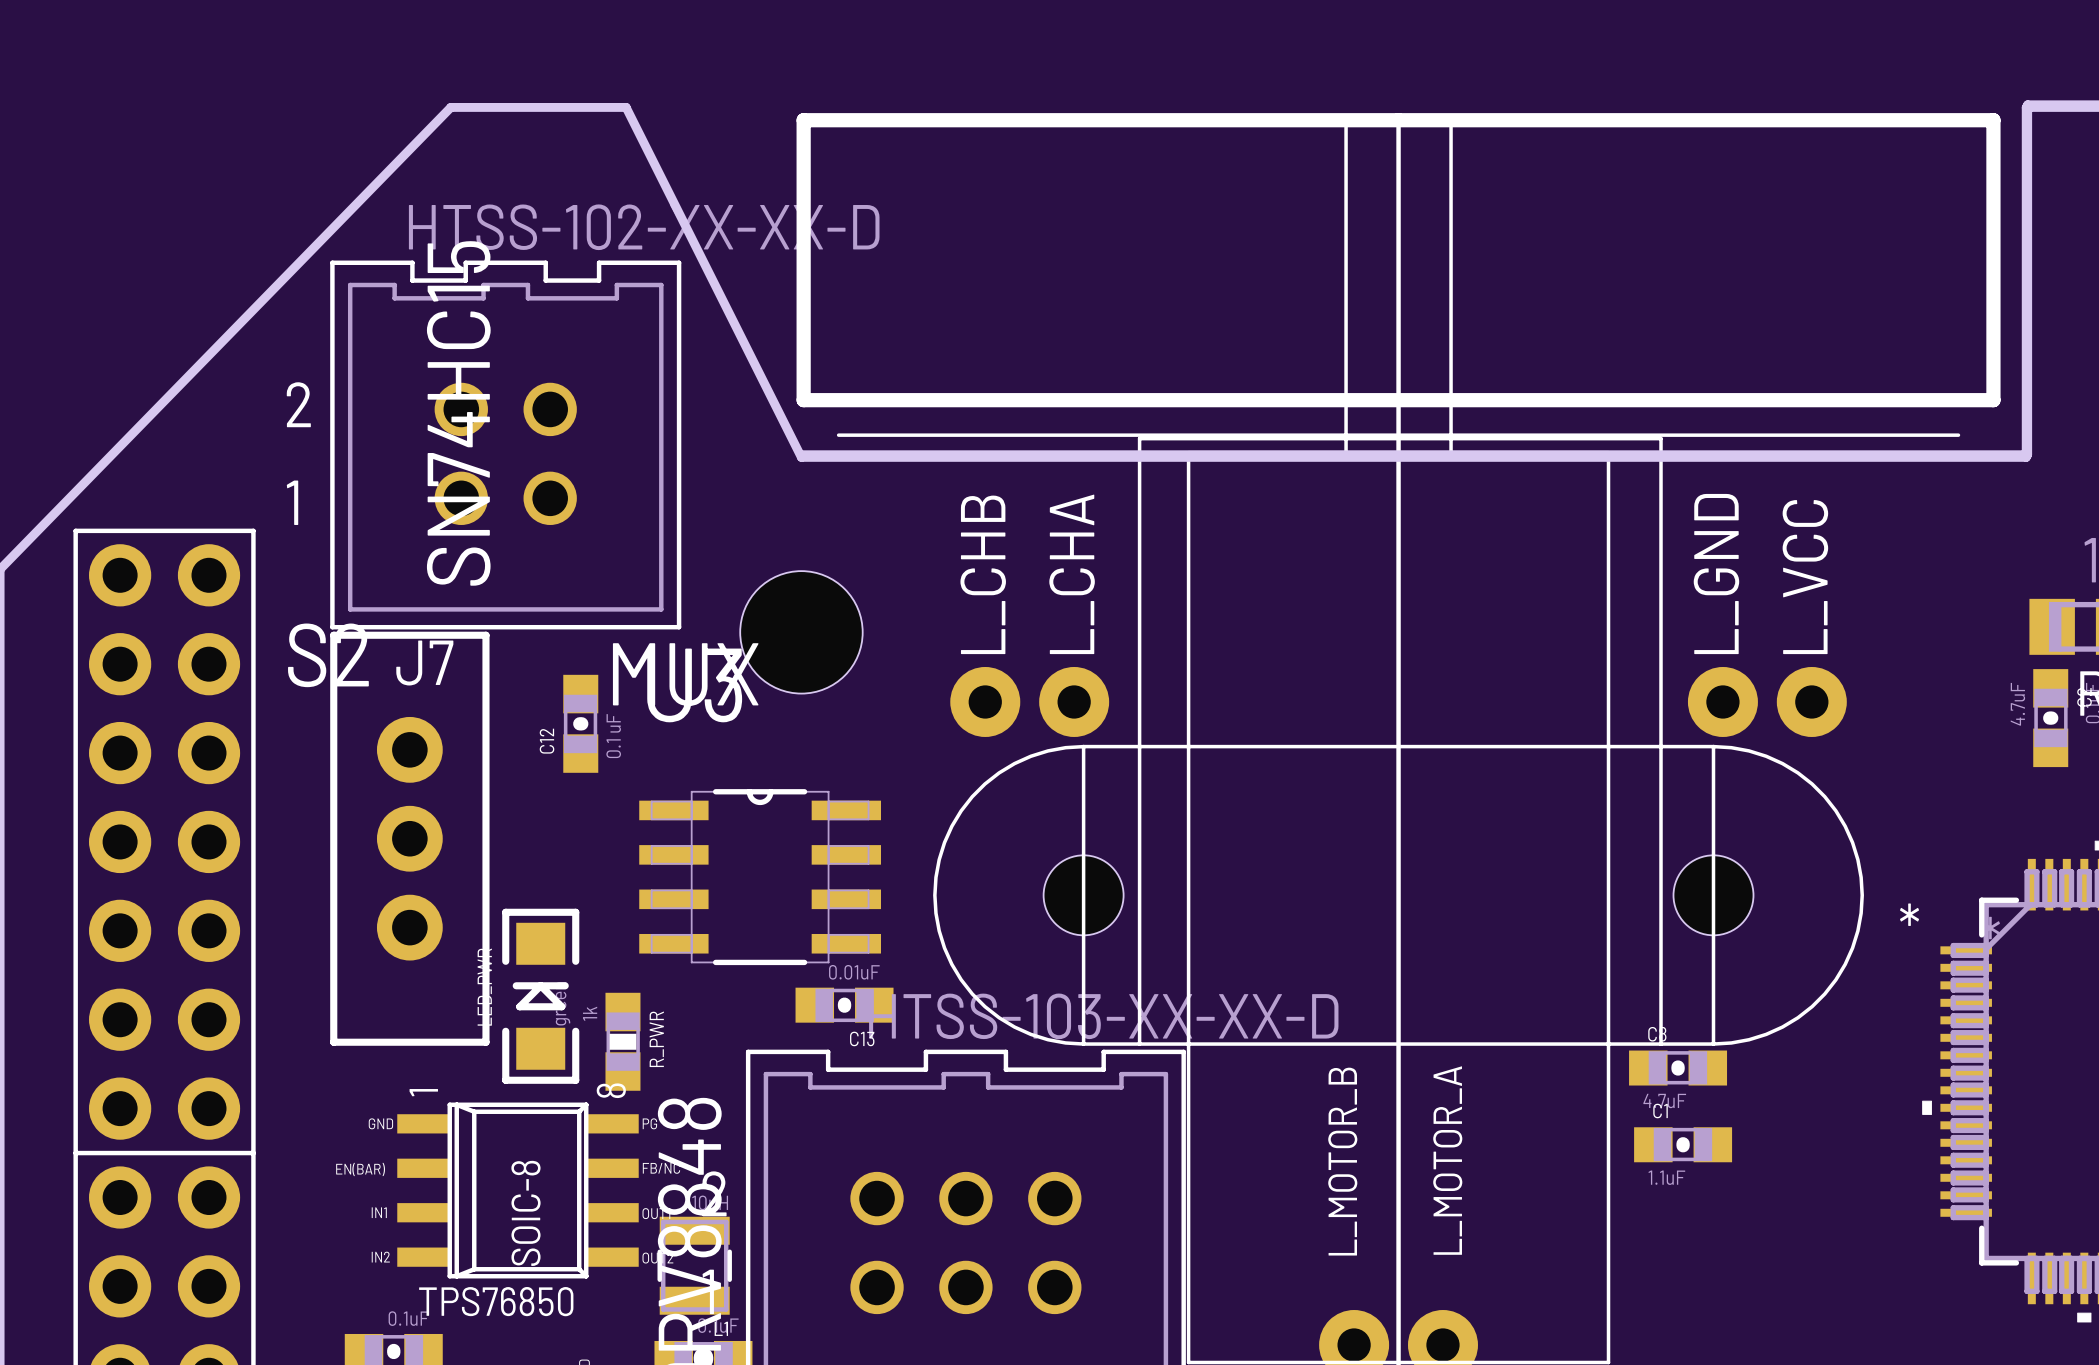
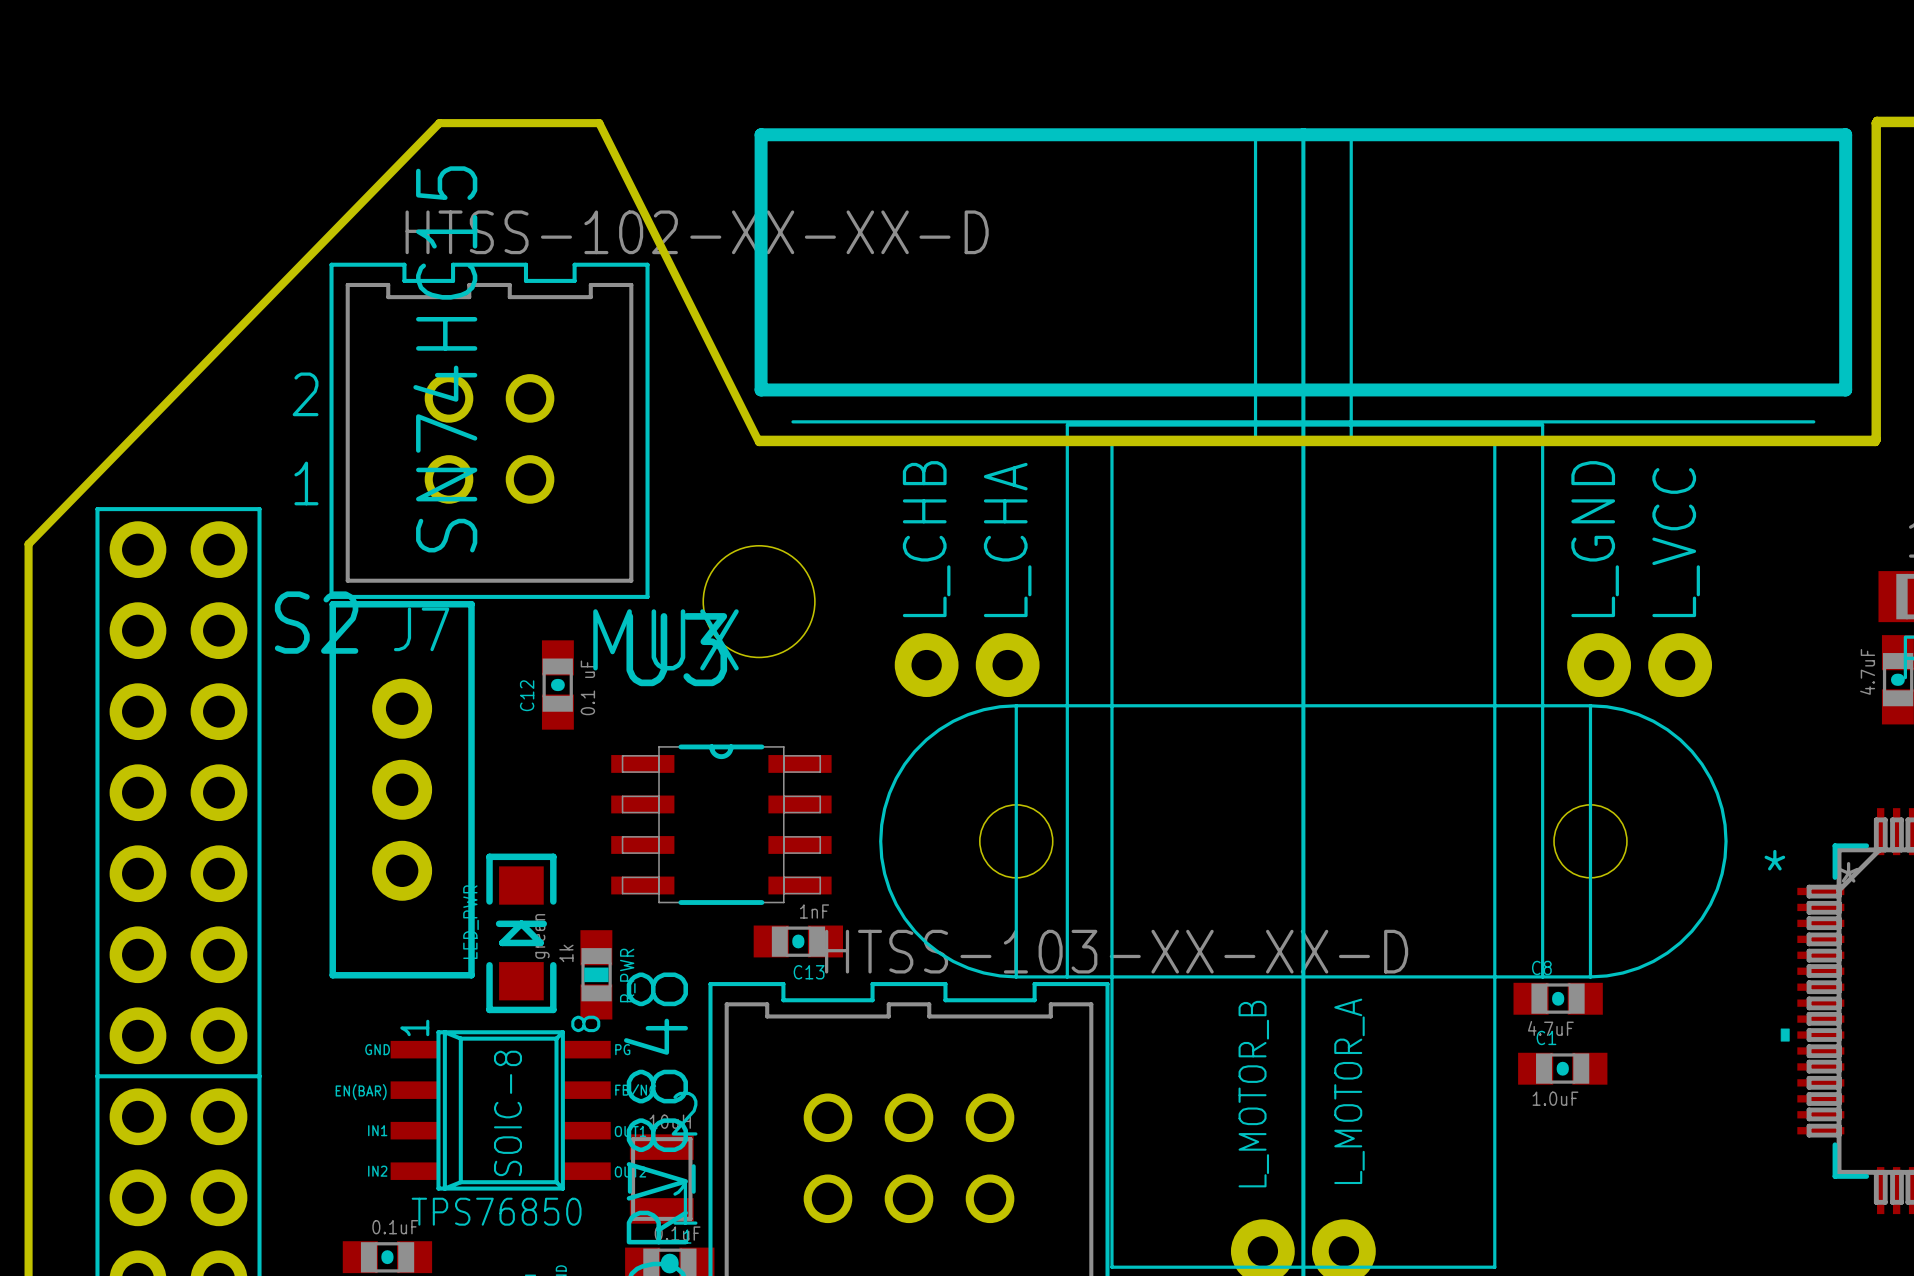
C13 value: 0.01uF (854, 972) -> 1nF (814, 911)
C1 value: 1.1uF (1666, 1177) -> 1.0uF (1555, 1098)

